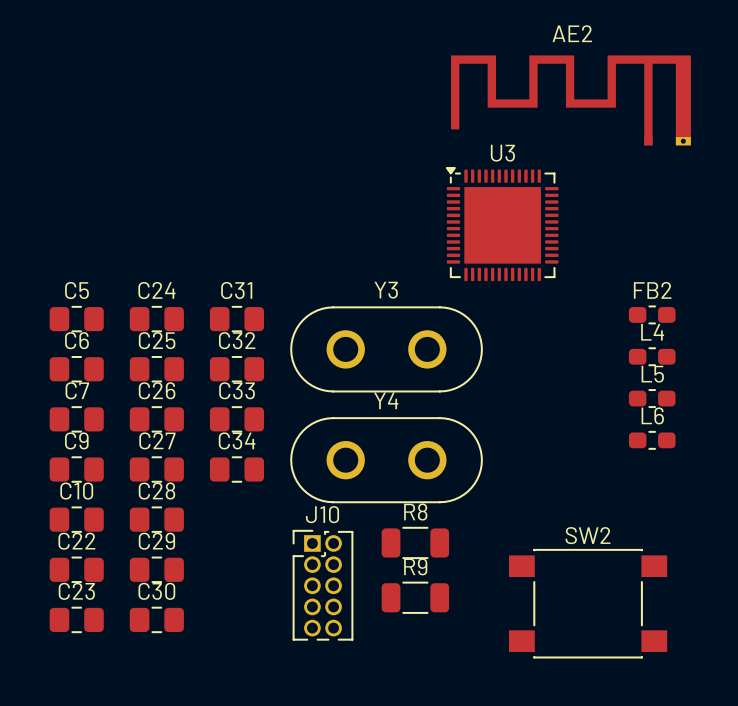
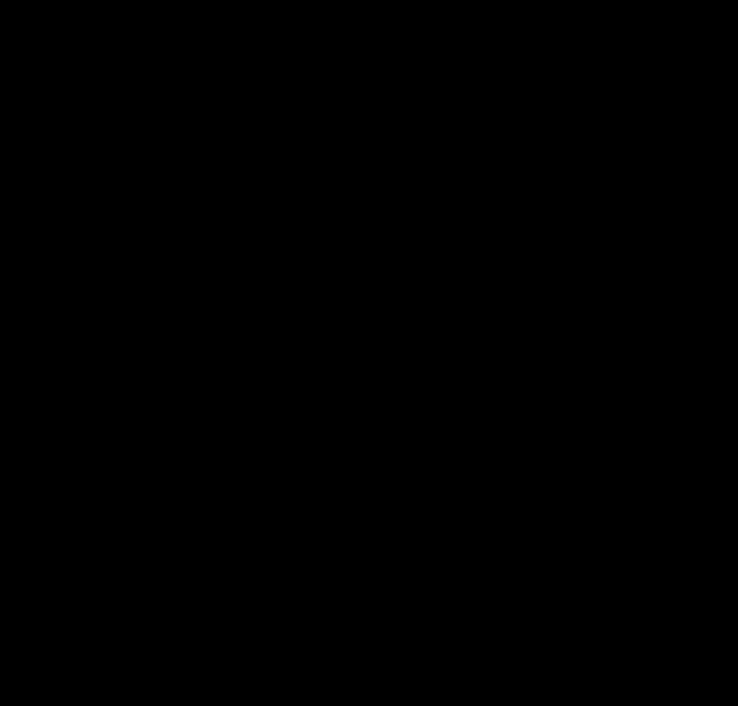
AE2: (570, 100) -> none
U3: (502, 224) -> none
FB2: (652, 314) -> none
C5: (76, 319) -> none
C24: (156, 319) -> none
C31: (236, 319) -> none
Y3: (386, 349) -> none
L4: (652, 356) -> none
C6: (76, 369) -> none
C25: (156, 369) -> none
C32: (236, 369) -> none
L5: (652, 398) -> none
C7: (76, 419) -> none
C26: (156, 419) -> none
C33: (236, 419) -> none
L6: (652, 440) -> none
Y4: (386, 460) -> none
C9: (76, 469) -> none
C27: (156, 469) -> none
C34: (236, 469) -> none
C10: (76, 519) -> none
C28: (156, 519) -> none
R8: (415, 542) -> none
C22: (76, 569) -> none
C29: (156, 569) -> none
J10: (323, 585) -> none
R9: (415, 597) -> none
SW2: (588, 603) -> none
C23: (76, 619) -> none
C30: (156, 619) -> none

